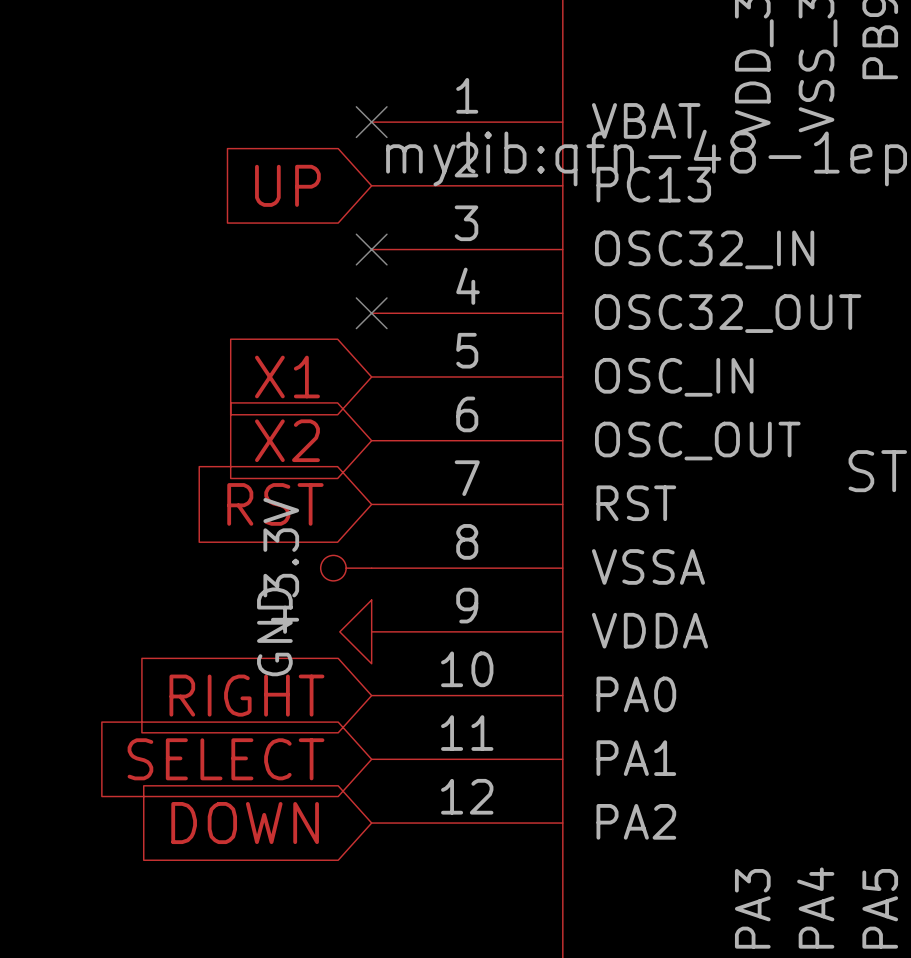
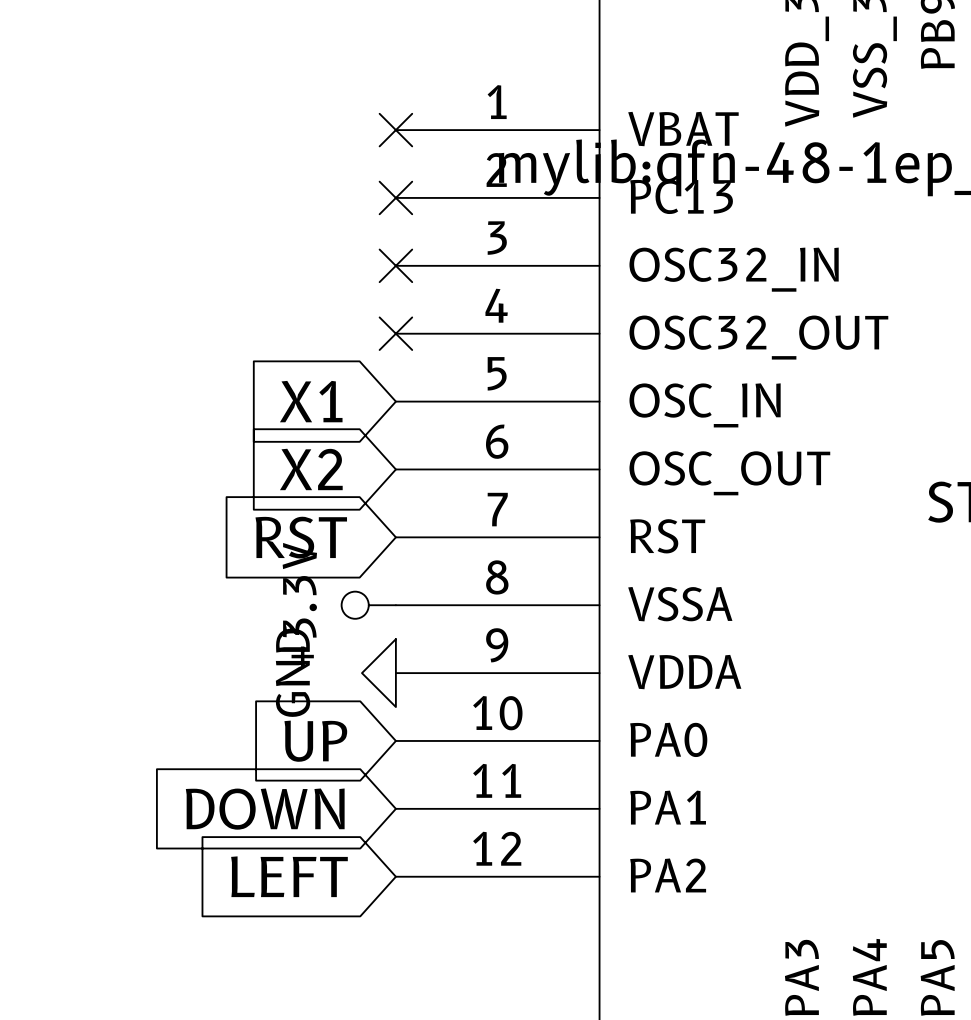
global label: UP (287, 185) -> none
no-connect mark: none -> (395, 197)
global label: RIGHT (246, 695) -> UP (315, 741)
global label: SELECT (226, 759) -> DOWN (265, 809)
global label: DOWN (245, 823) -> LEFT (289, 876)

